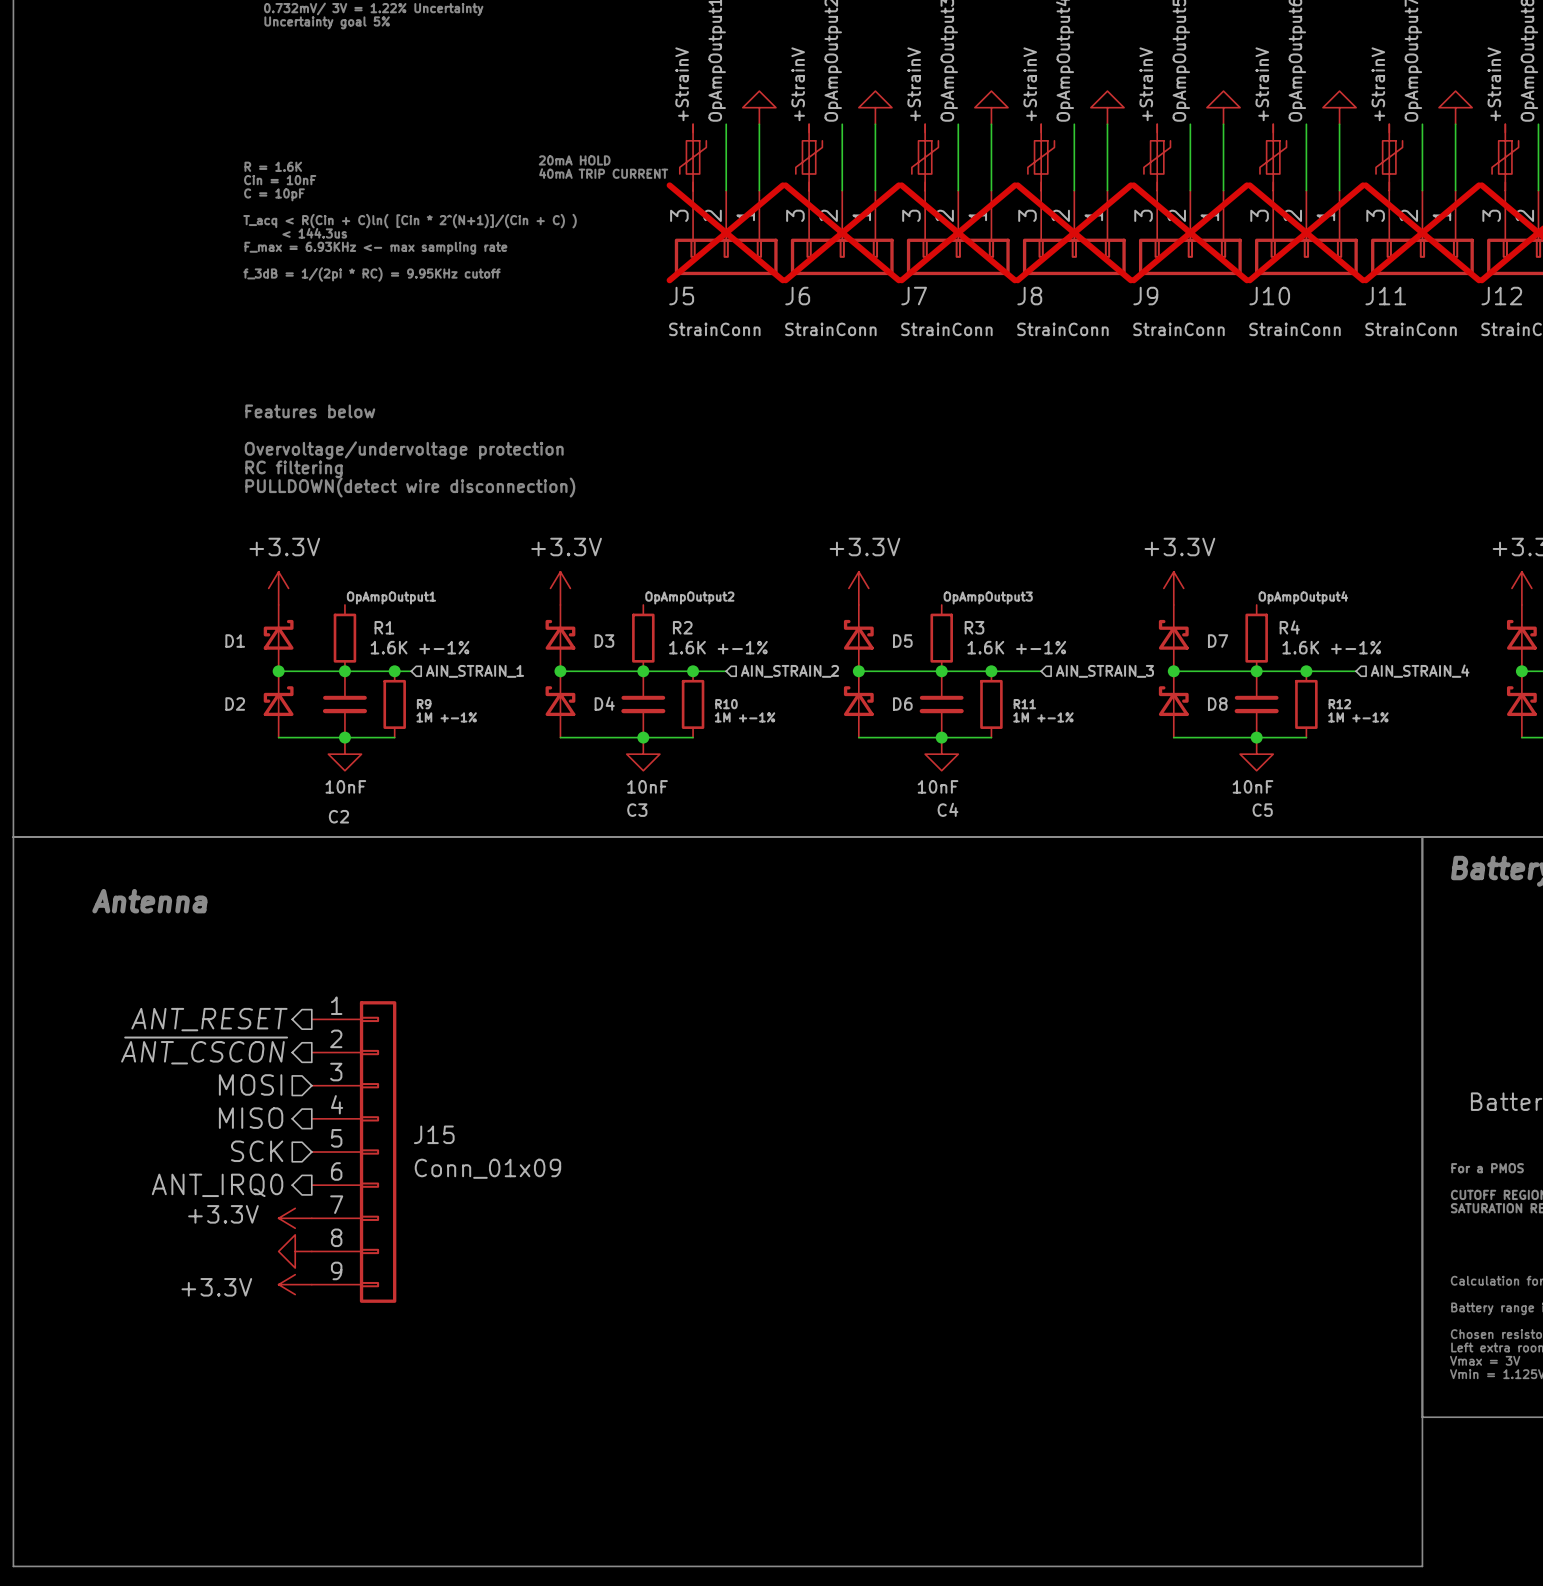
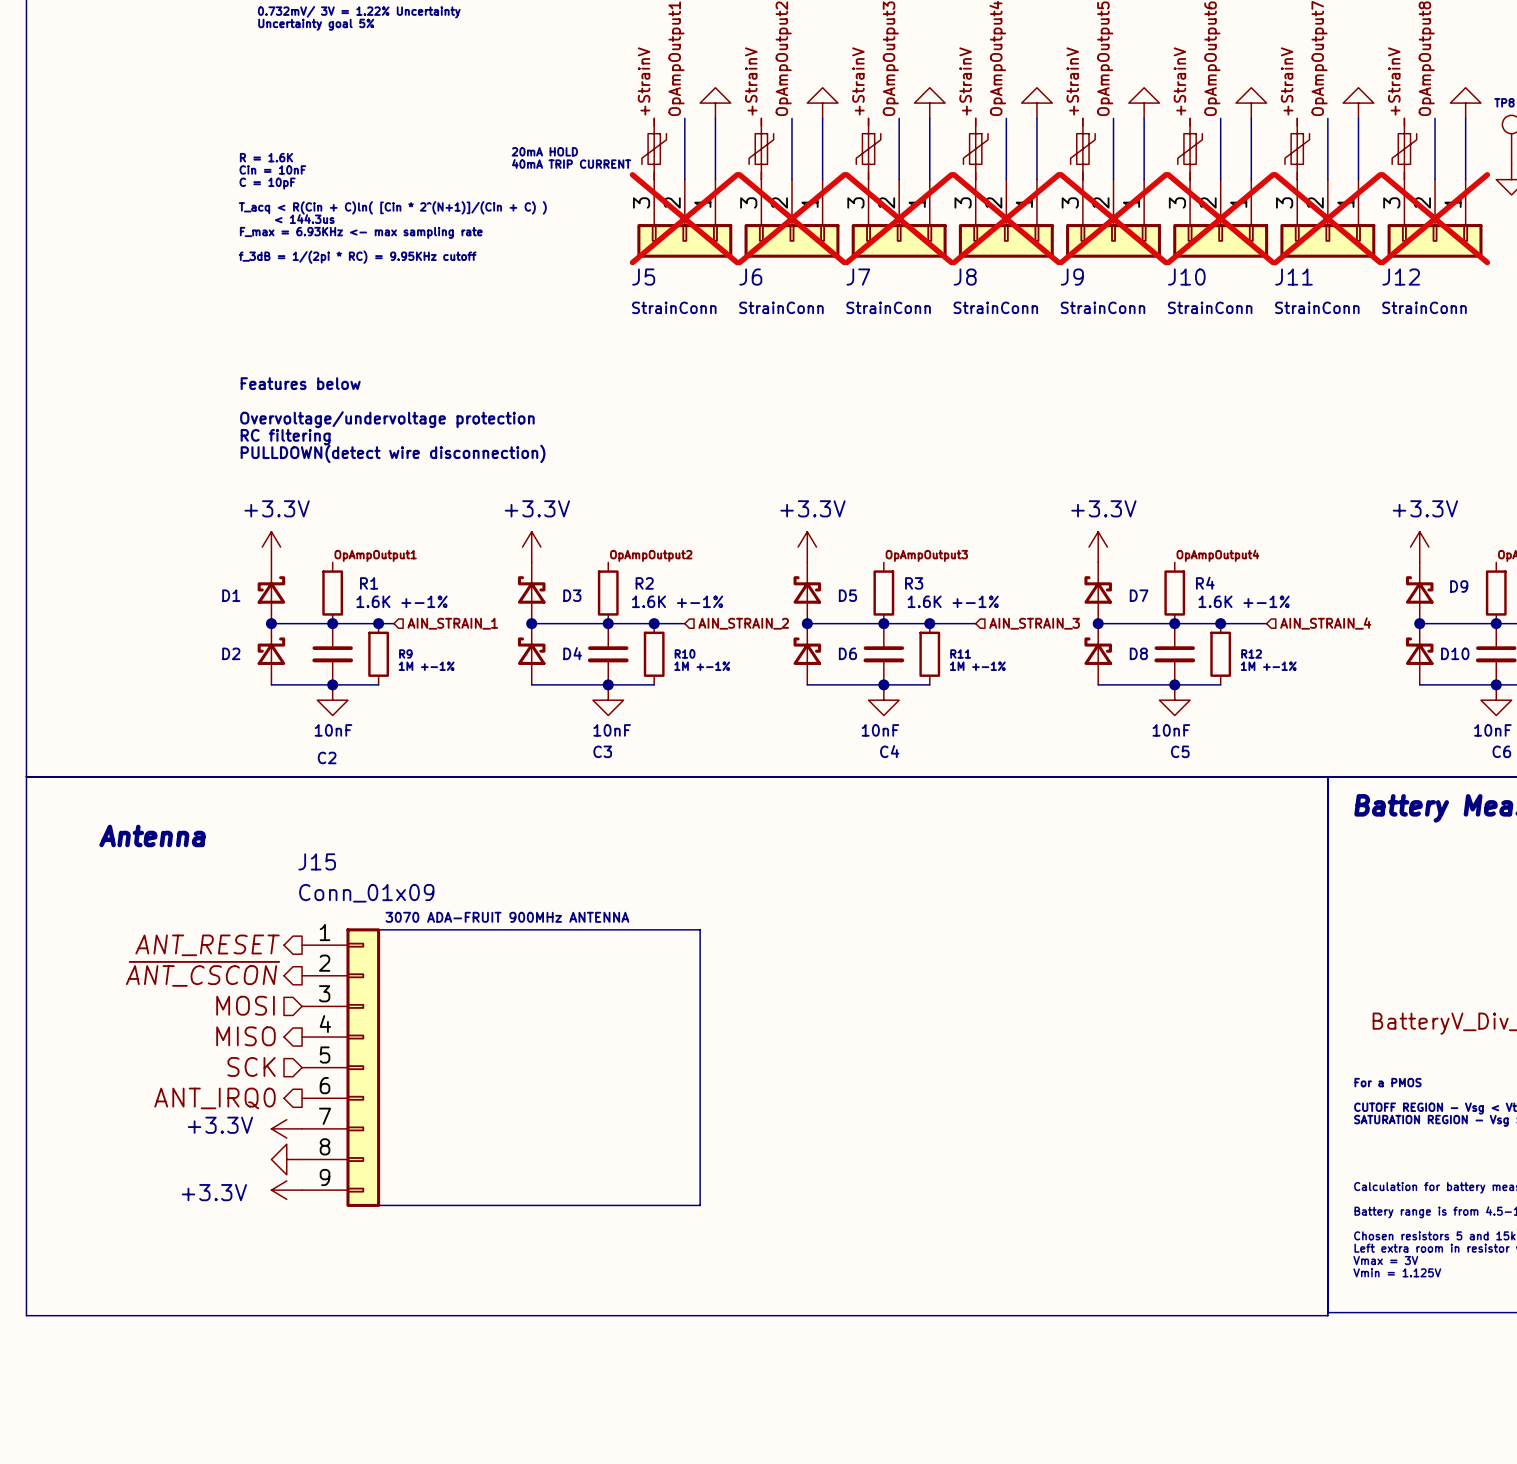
text: none -> 3070 ADA-FRUIT 900MHz ANTENNA (507, 917)
line: none -> (378, 929) (700, 929) (700, 1205) (378, 1205) (378, 929)
J15 name position: J15 (434, 1134) -> J15 (317, 861)
J15 value position: Conn_01x09 (487, 1168) -> Conn_01x09 (366, 893)
line: (13, 1420) (13, 1566) (1422, 1566) (1422, 1420) -> (26, 1315) (1327, 1315)

